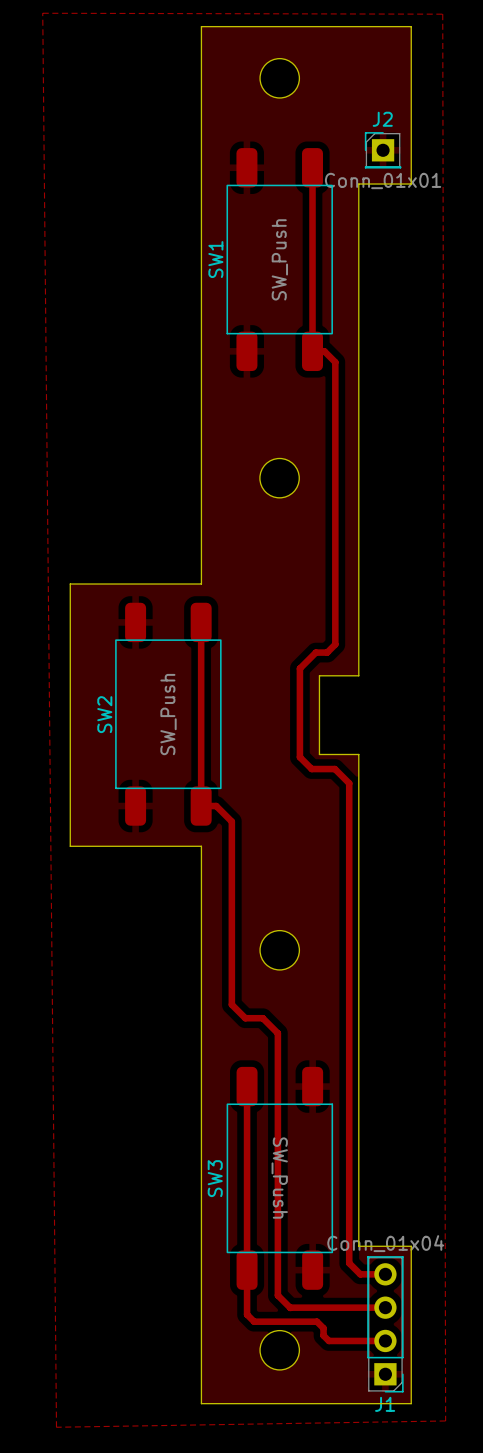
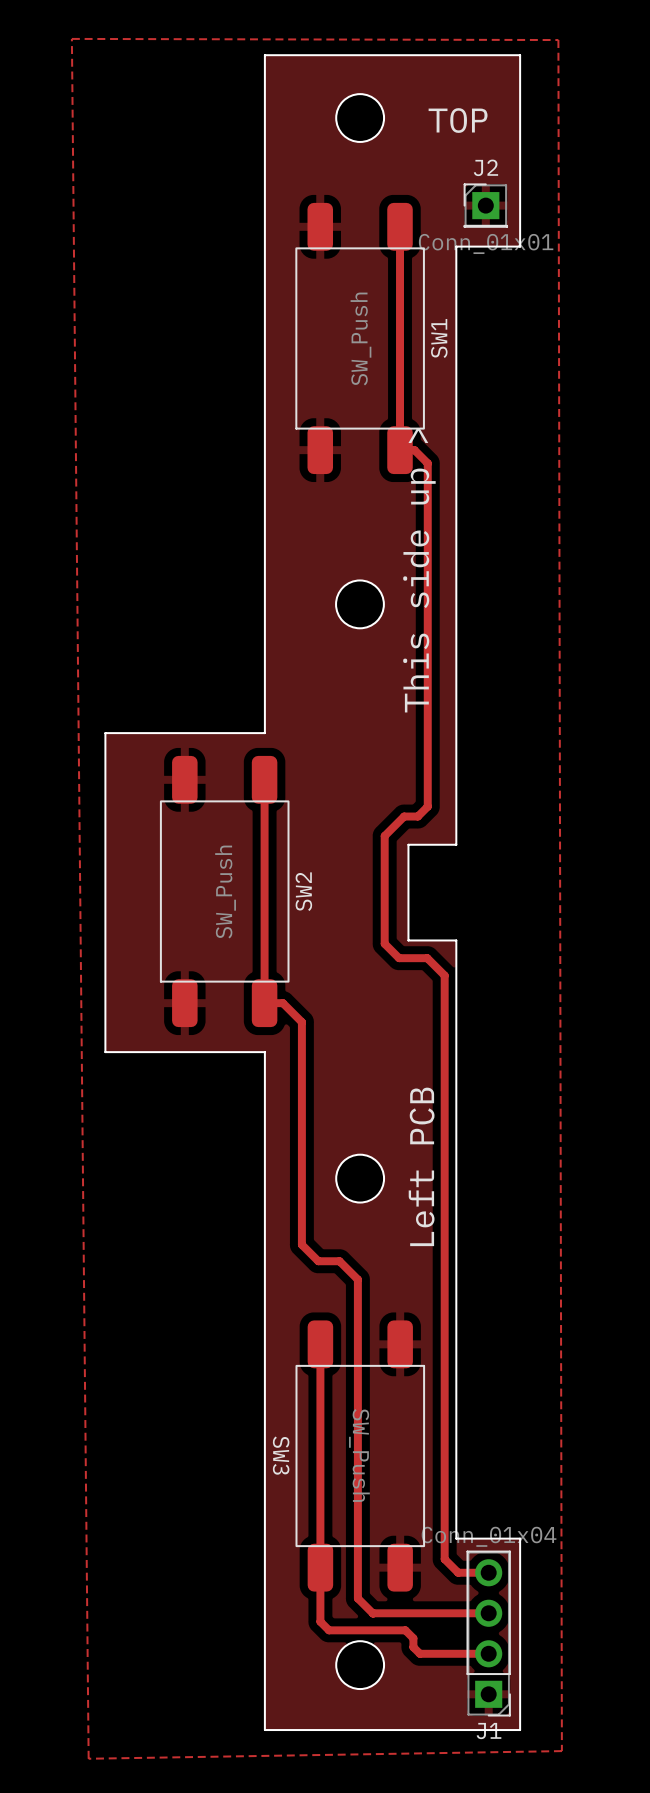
text: none -> TOP (458, 120)
SW1 name position: SW1 (215, 259) -> SW1 (439, 338)
text: none -> This side up > (419, 570)
SW2 name position: SW2 (104, 714) -> SW2 (303, 891)
text: none -> Left PCB (421, 1166)
SW3 name rotation: 0° (215, 1178) -> 180° (281, 1455)

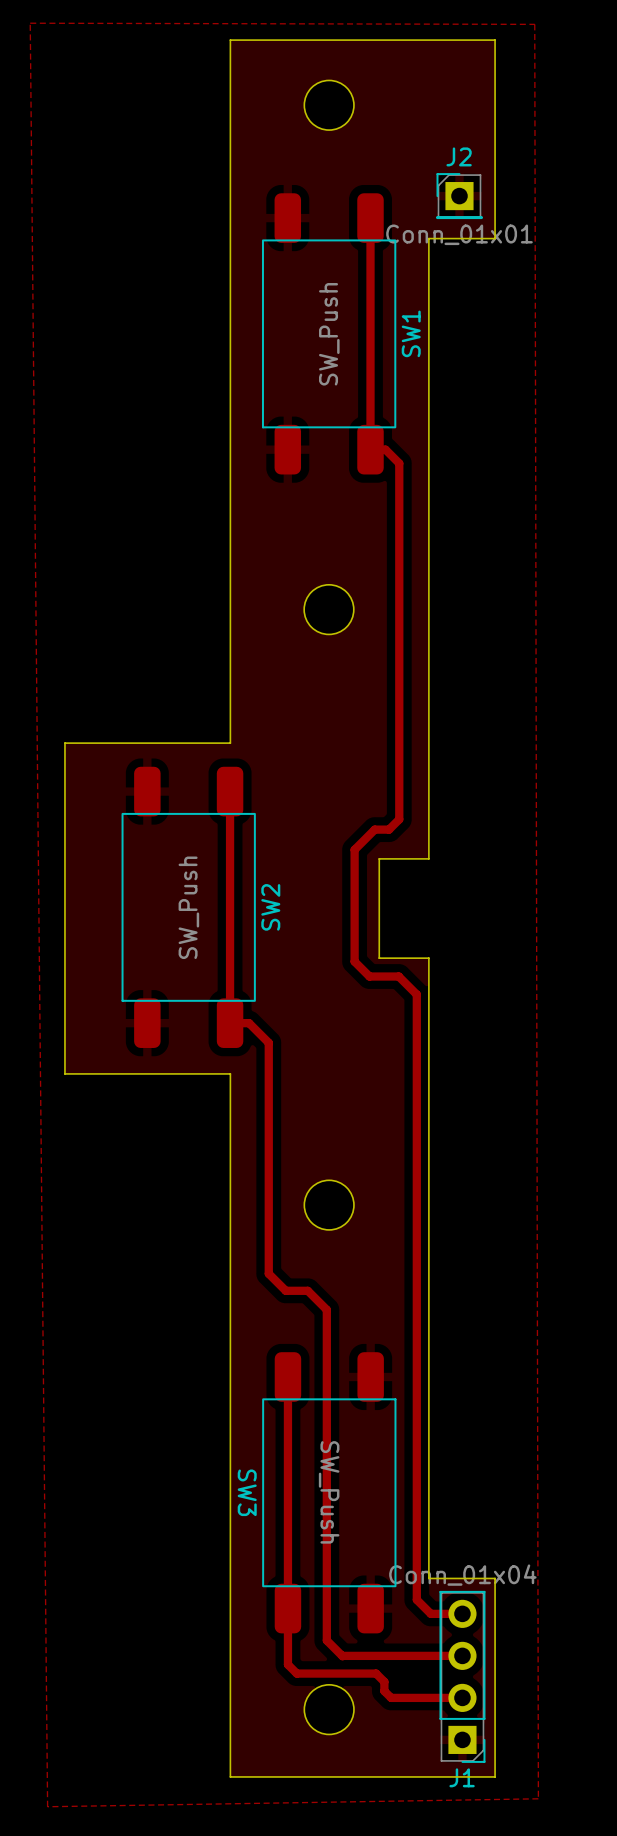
text: TOP (458, 120) -> none
text: This side up > (419, 570) -> none
text: Left PCB (421, 1166) -> none

